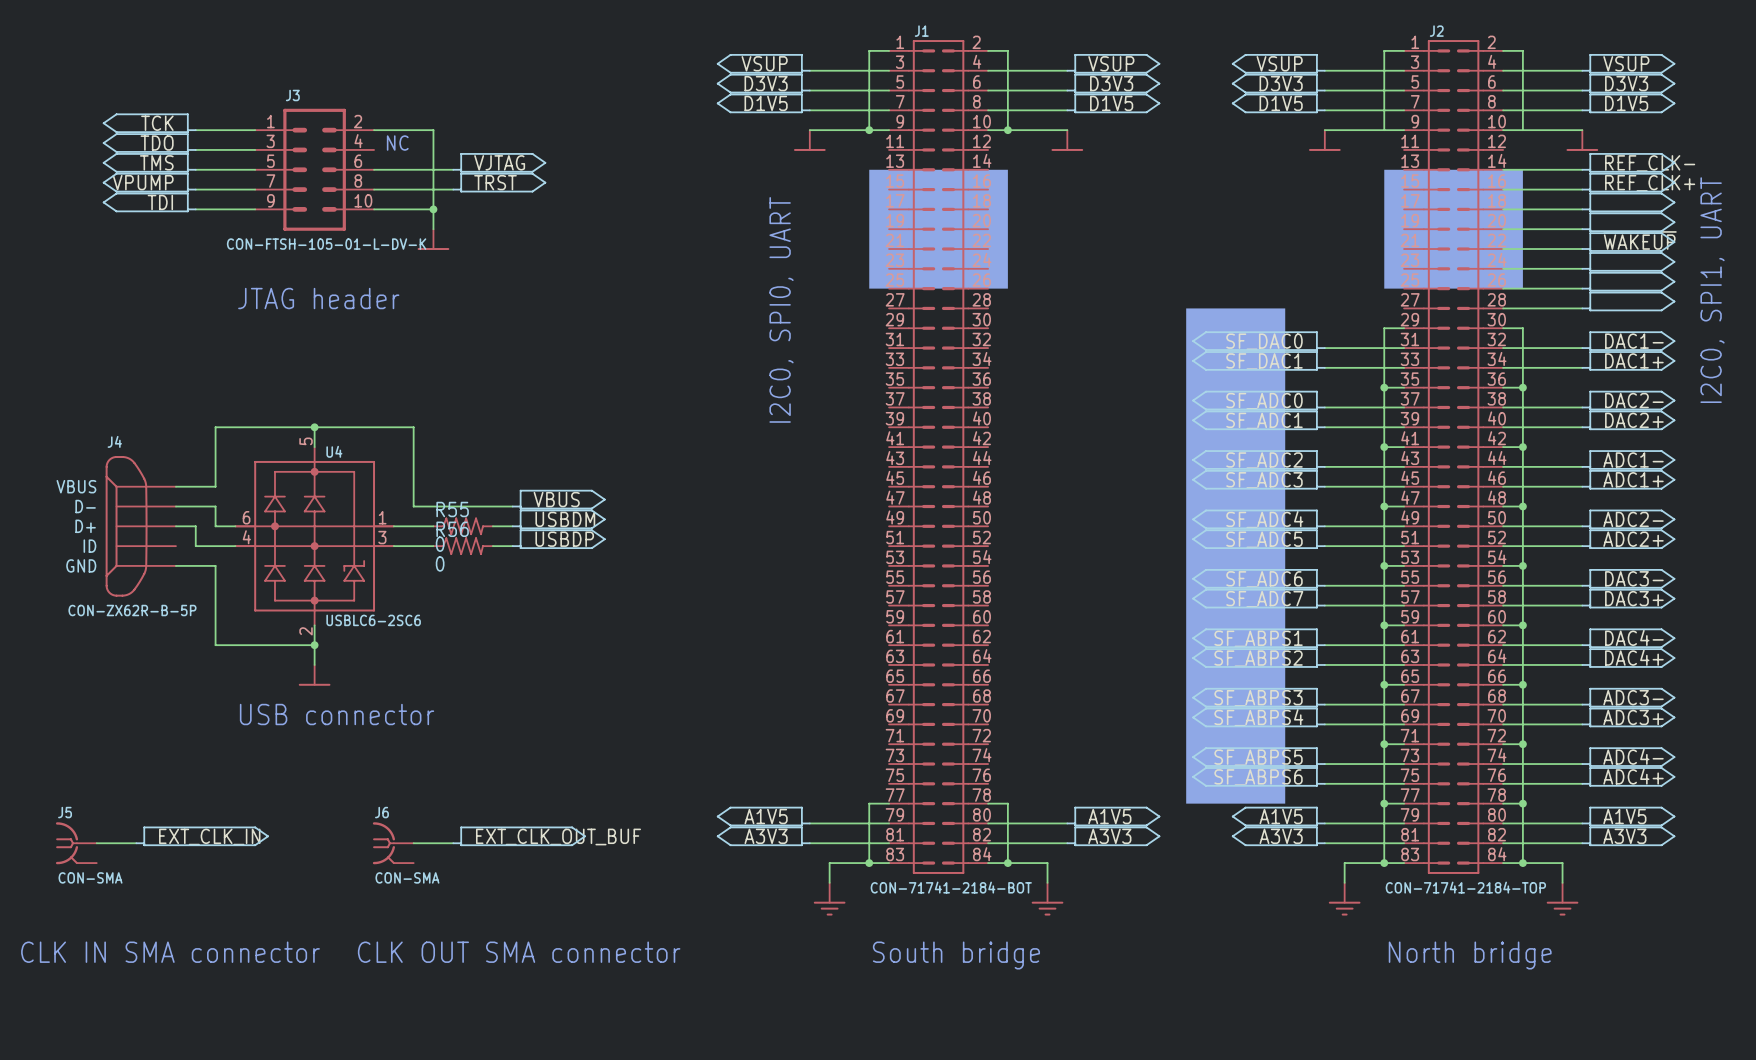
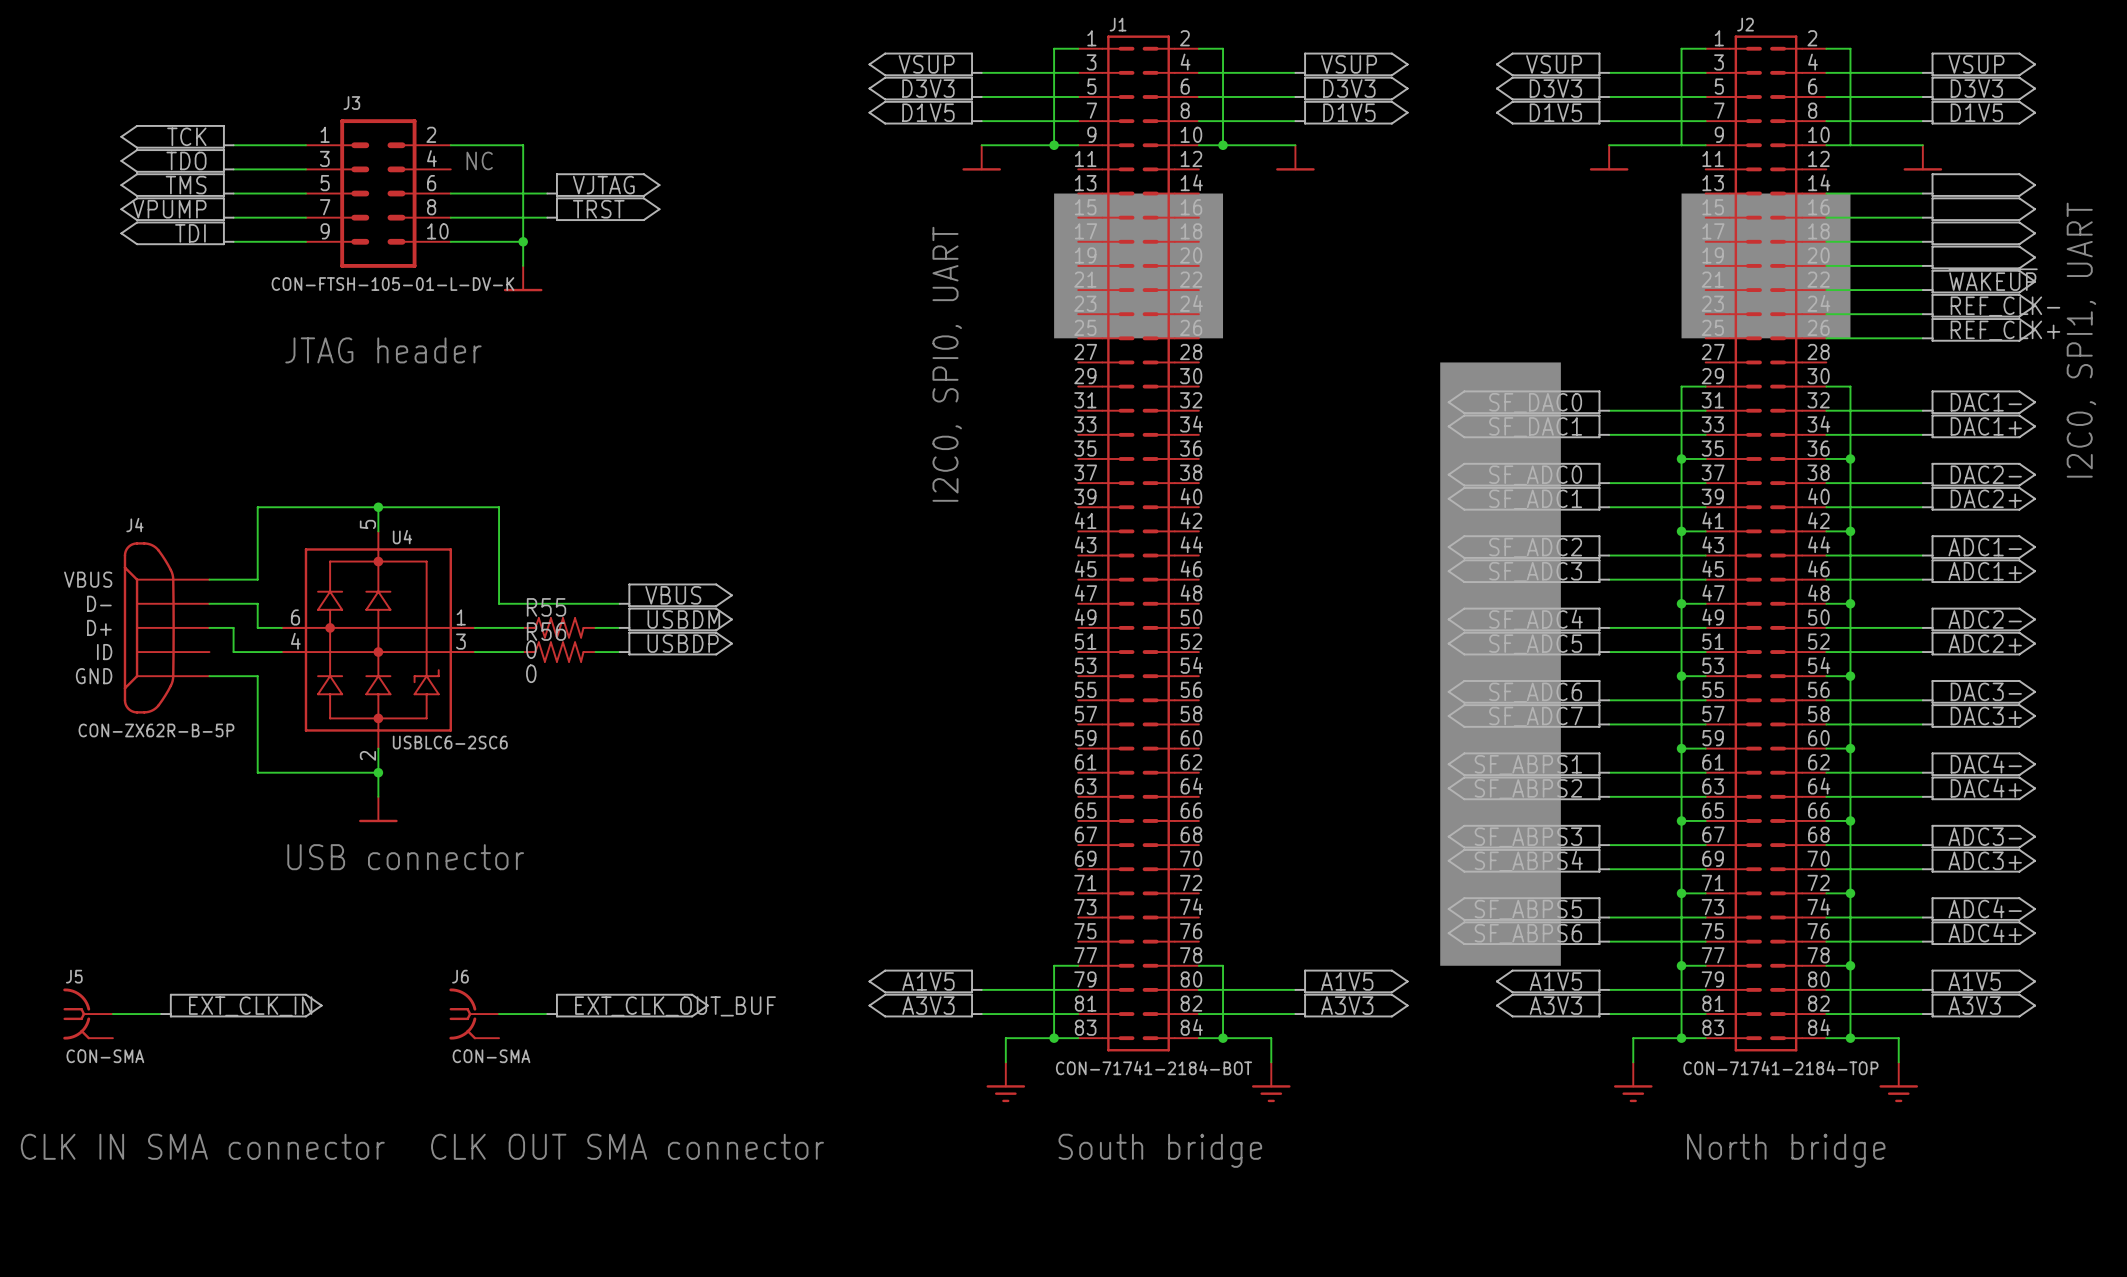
label position: REF_CLK- (1650, 163) -> REF_CLK- (2005, 306)
label position: REF_CLK+ (1650, 183) -> REF_CLK+ (2005, 330)
part: (1628, 301) -> none
wire: (1503, 308) (1582, 308) -> none

